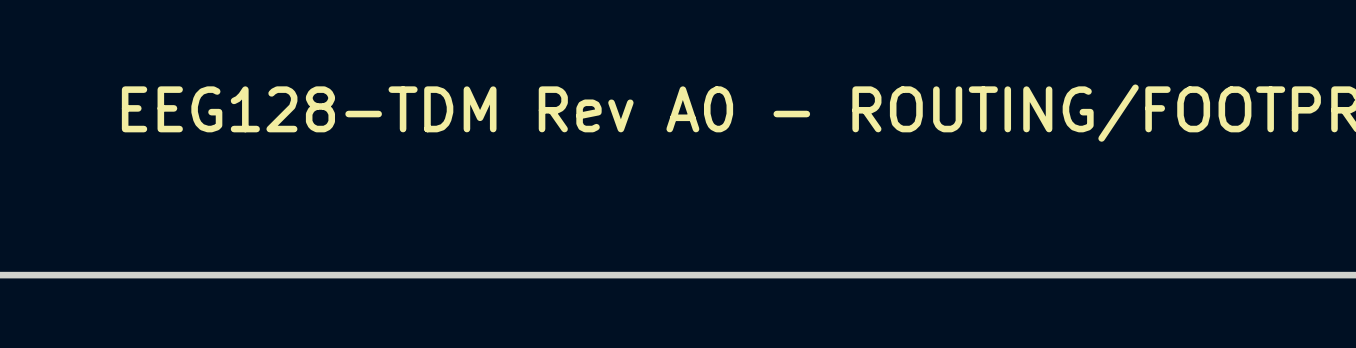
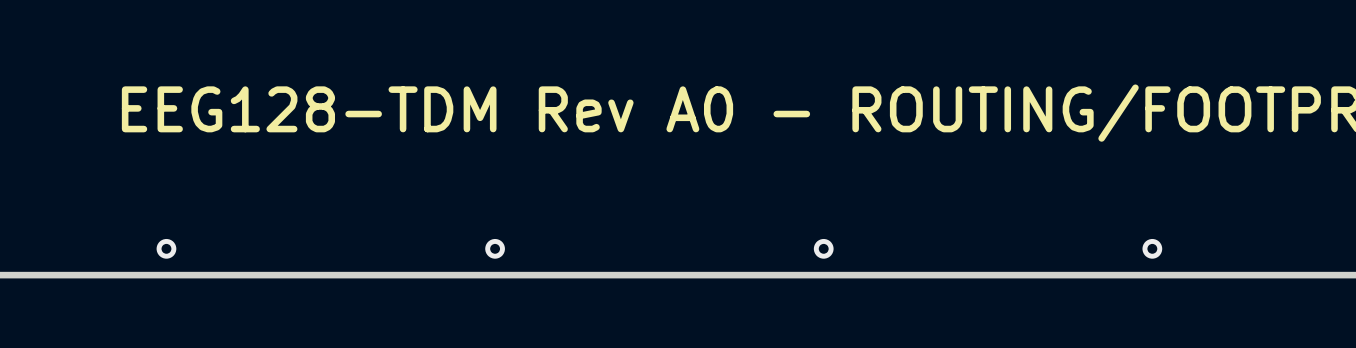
via: none -> (166, 248)
via: none -> (495, 248)
via: none -> (823, 248)
via: none -> (1152, 248)

